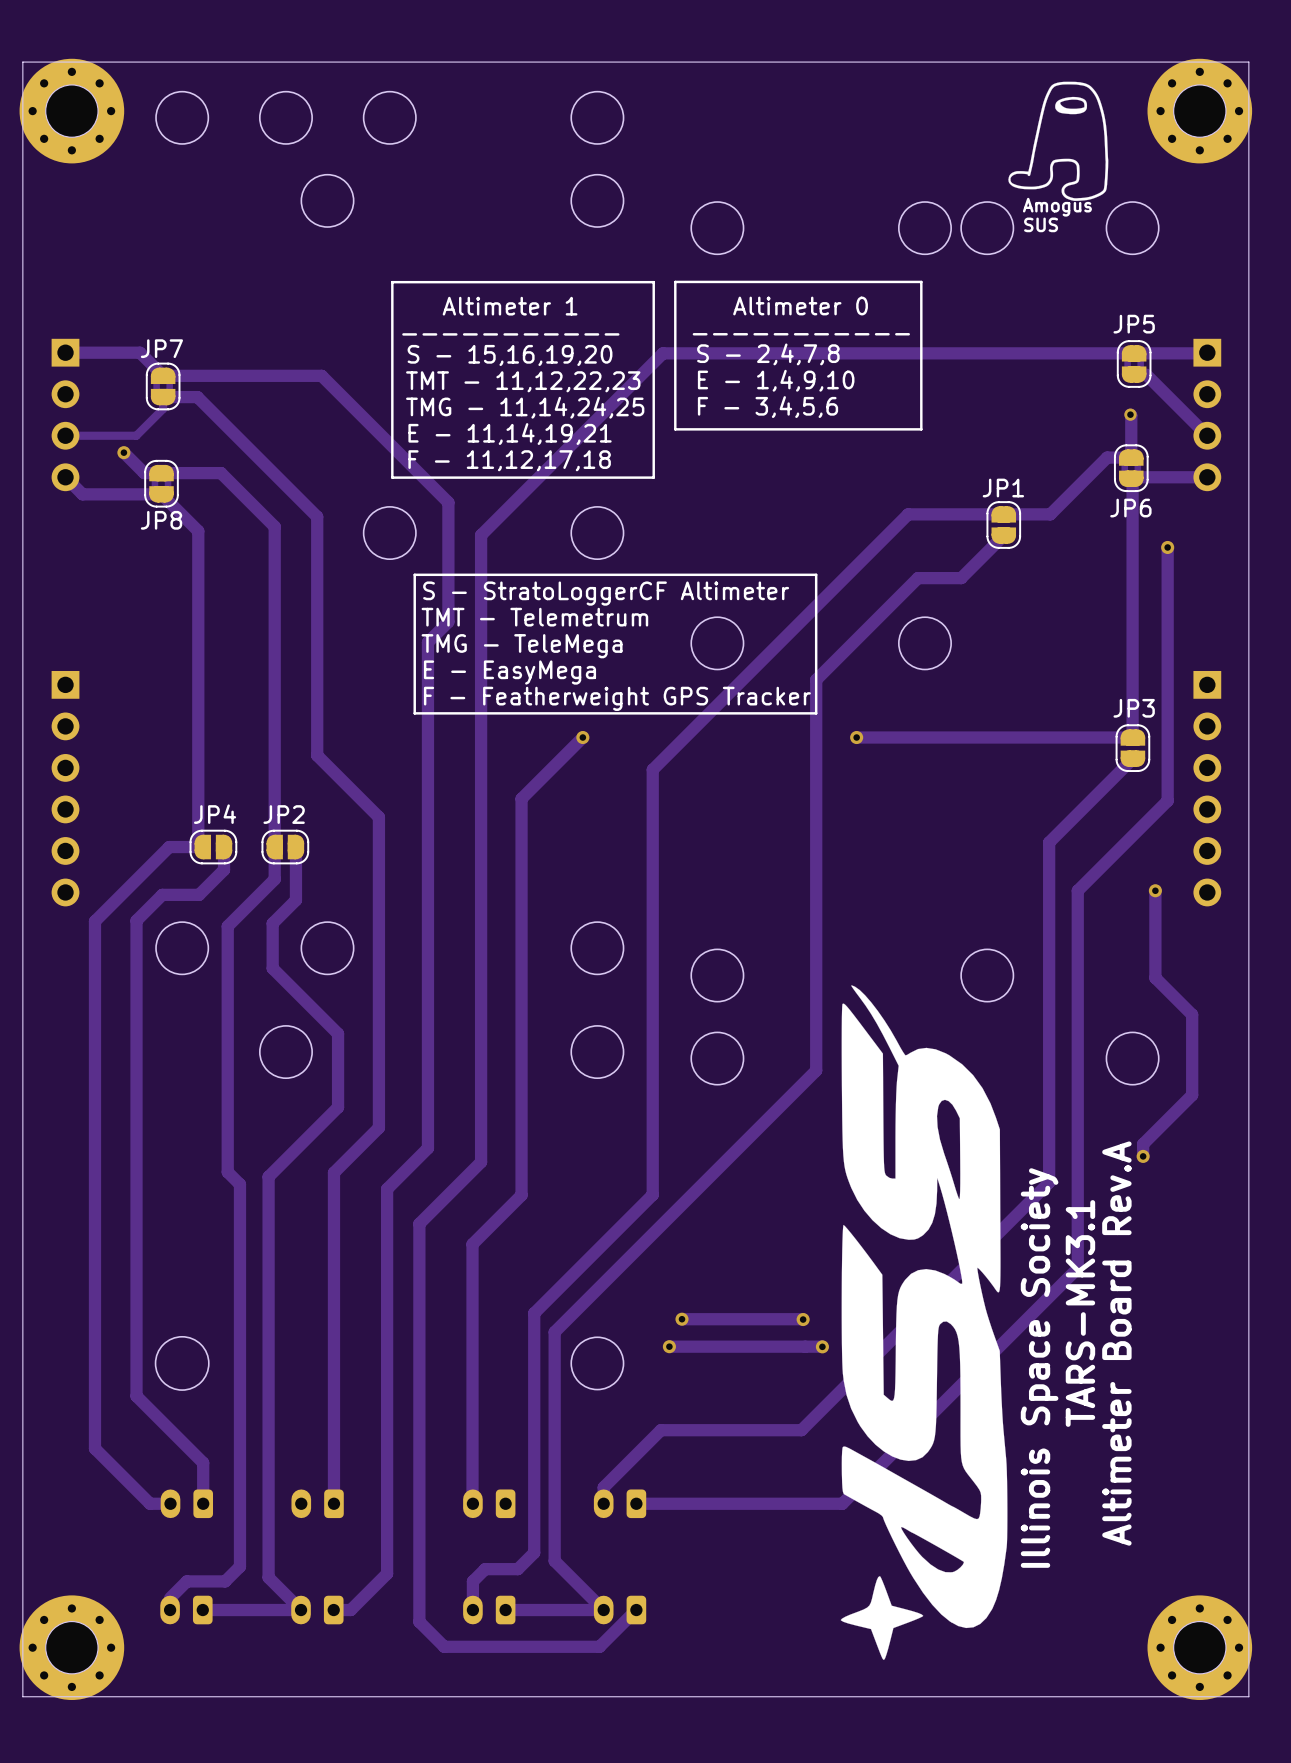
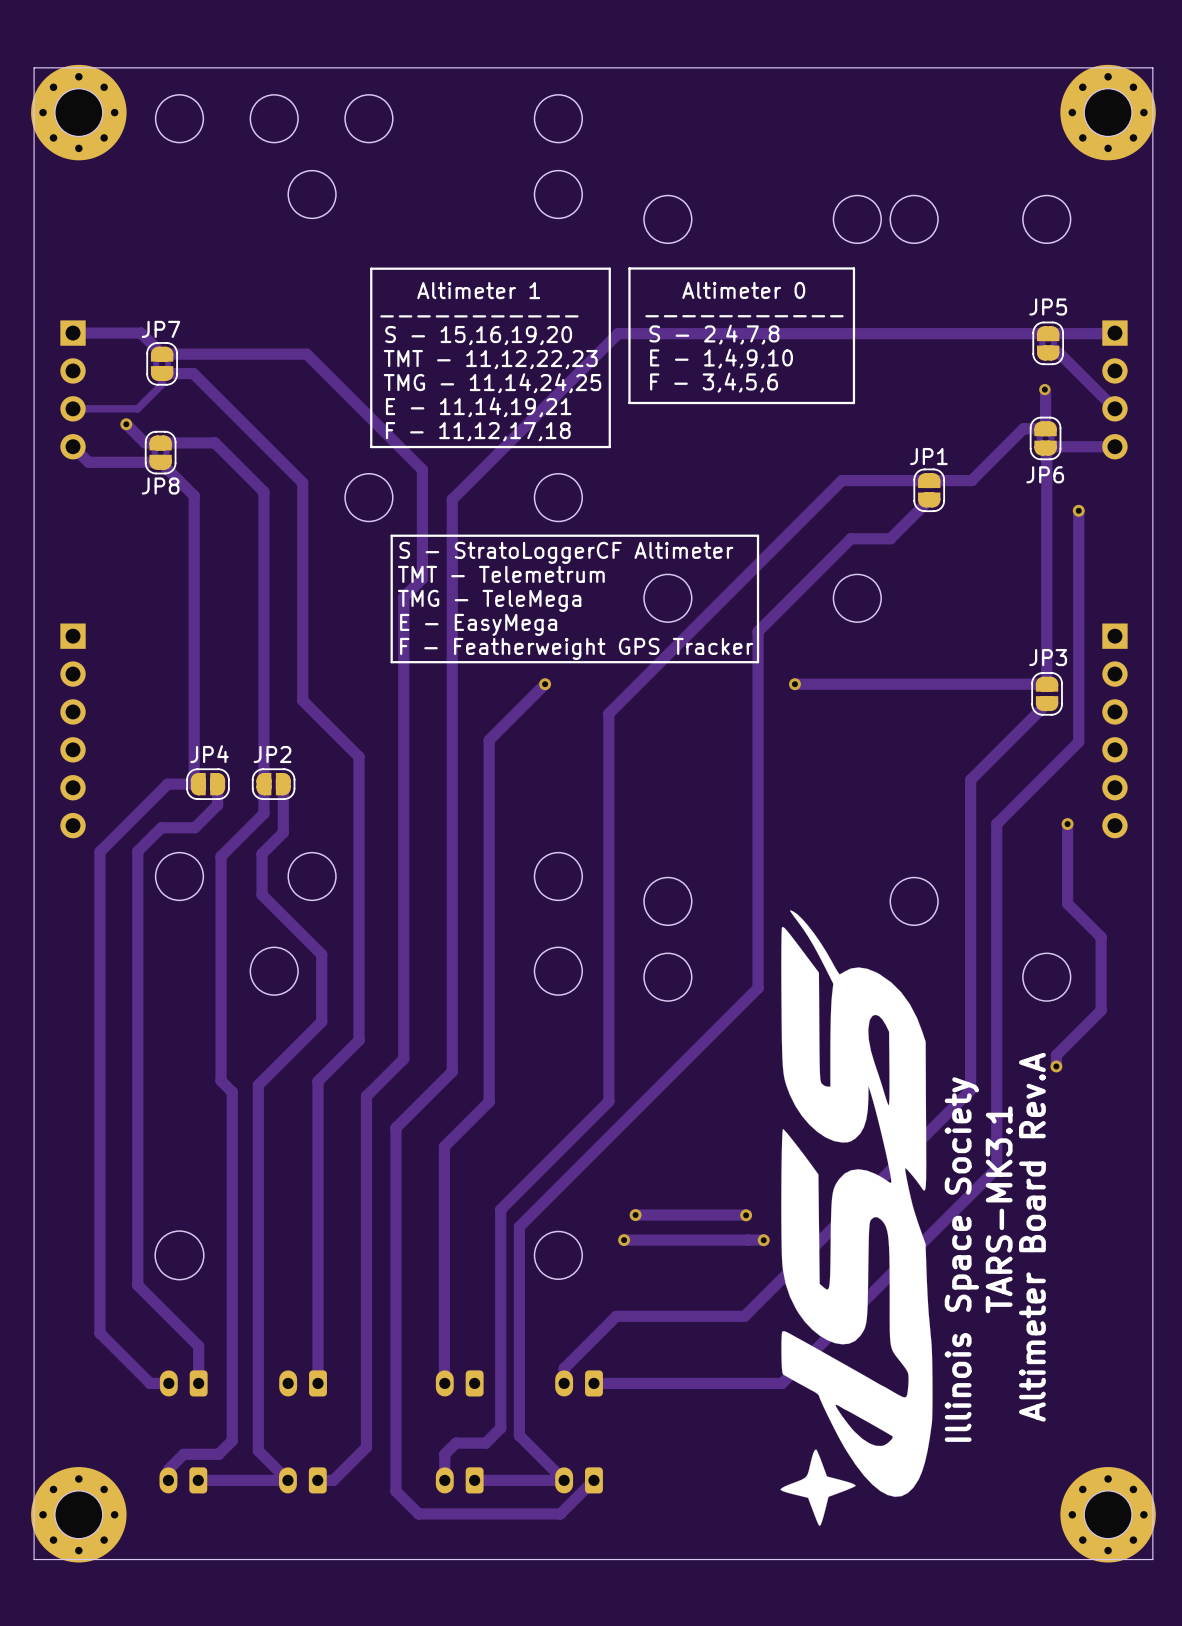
drawing: [1008, 81, 1109, 201] -> none
text: Amogus (1057, 207) -> none
text: SUS (1041, 224) -> none

